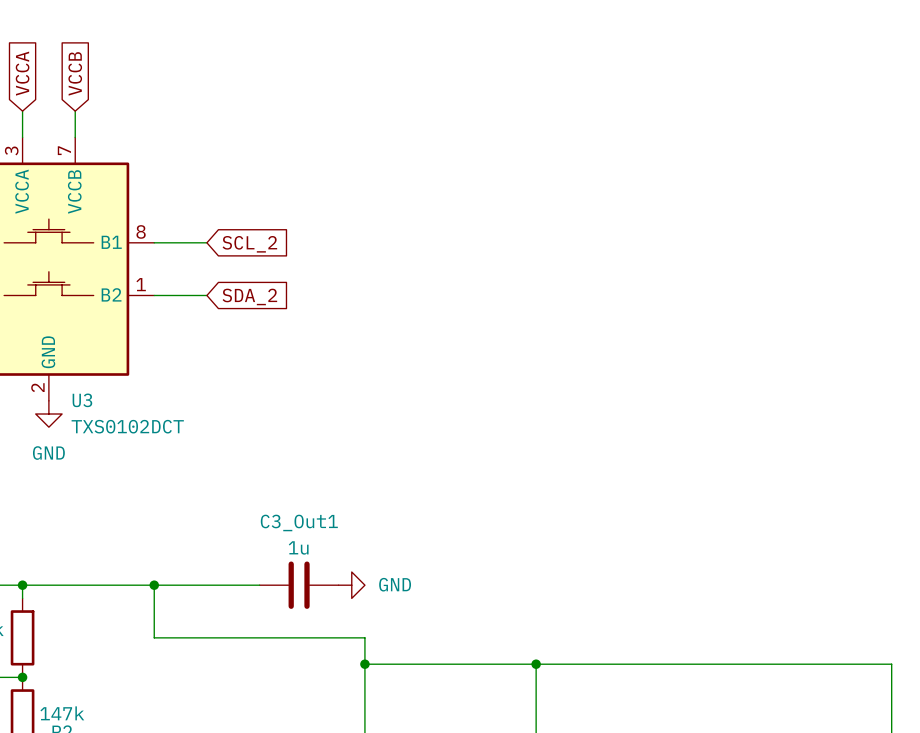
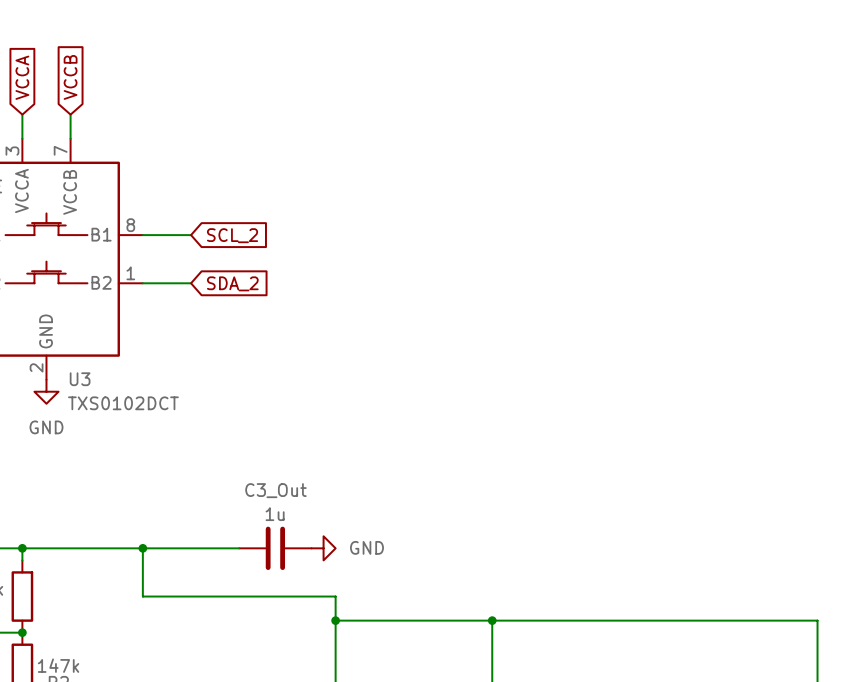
C3_Out1 name: C3_Out1 (299, 522) -> C3_Out (275, 490)

